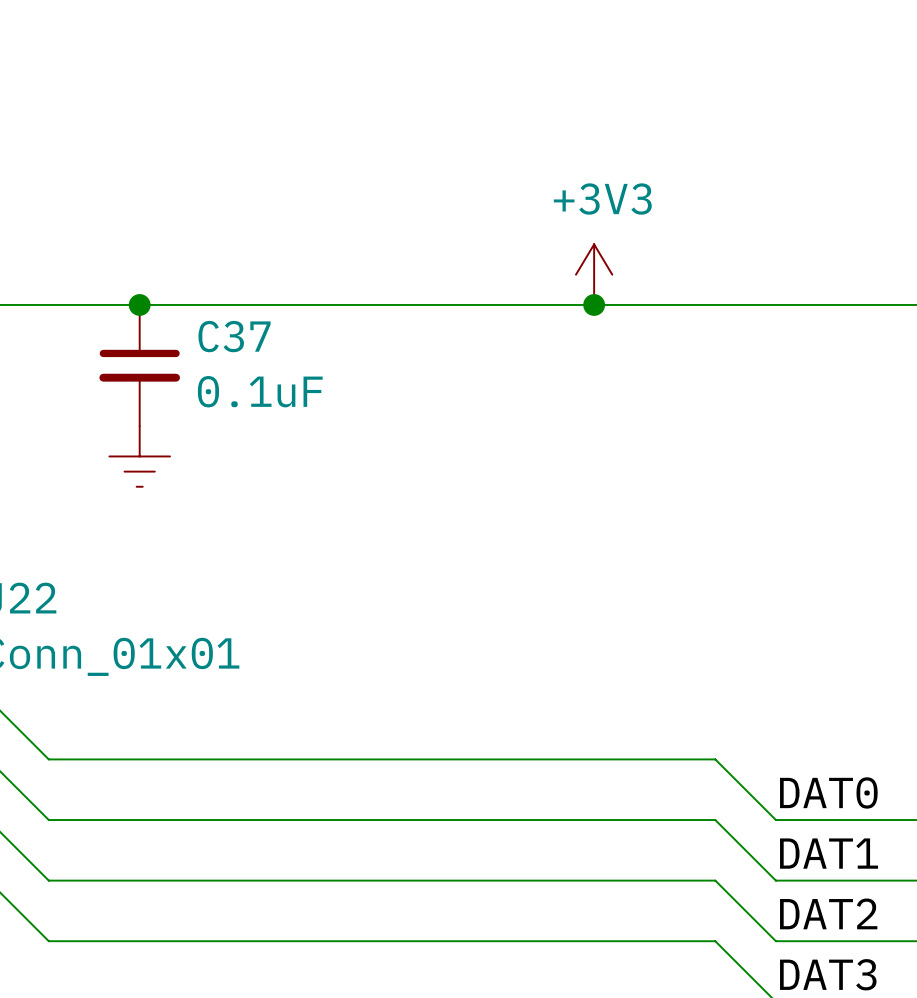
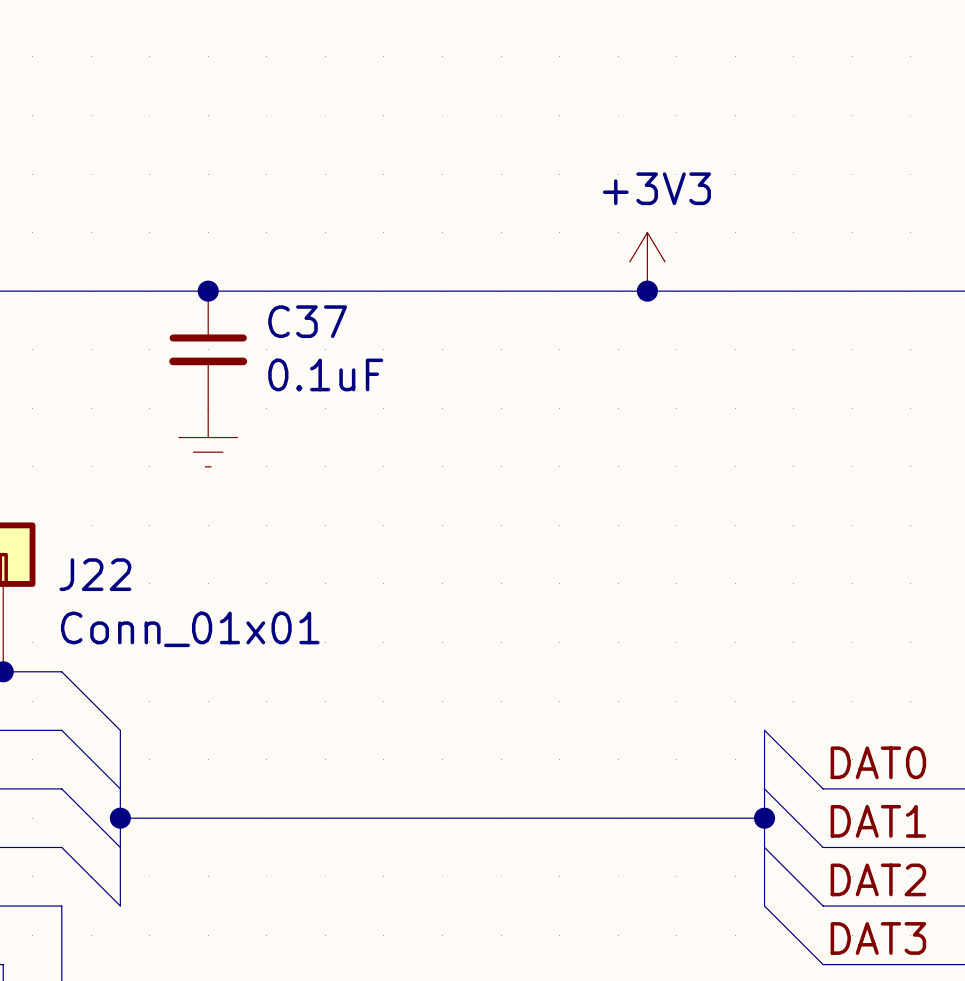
wire: (48, 759) (715, 759) -> none
bus: none -> (120, 730) (120, 906)
bus: none -> (764, 730) (764, 906)
wire: (48, 820) (715, 820) -> none
bus: none -> (120, 818) (764, 818)
junction: none -> (120, 818)
junction: none -> (764, 818)
wire: (48, 880) (715, 880) -> none
wire: (48, 941) (715, 941) -> none

